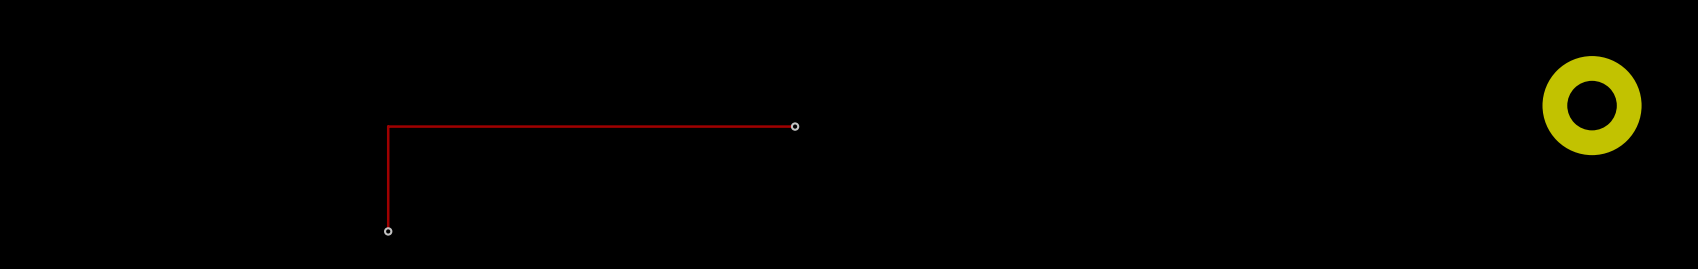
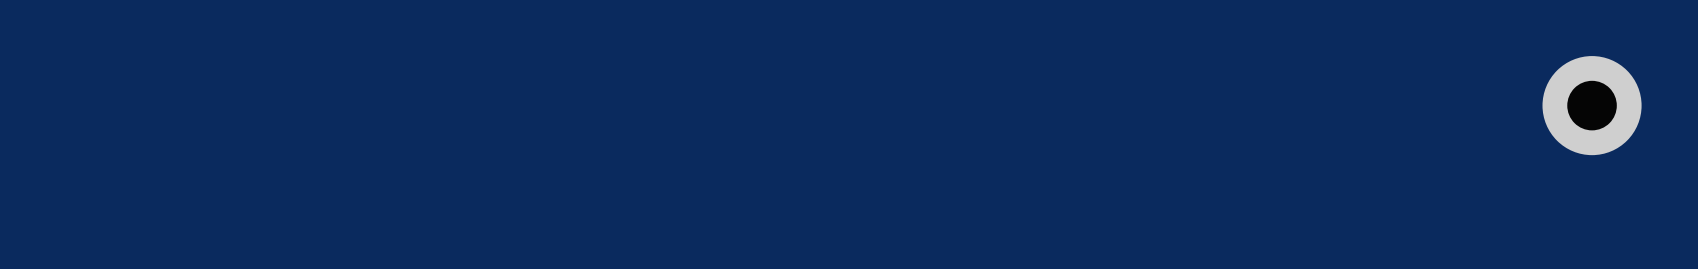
track: (795, 126) (388, 126) (388, 231) -> none
via: (795, 126) -> none
via: (388, 231) -> none

